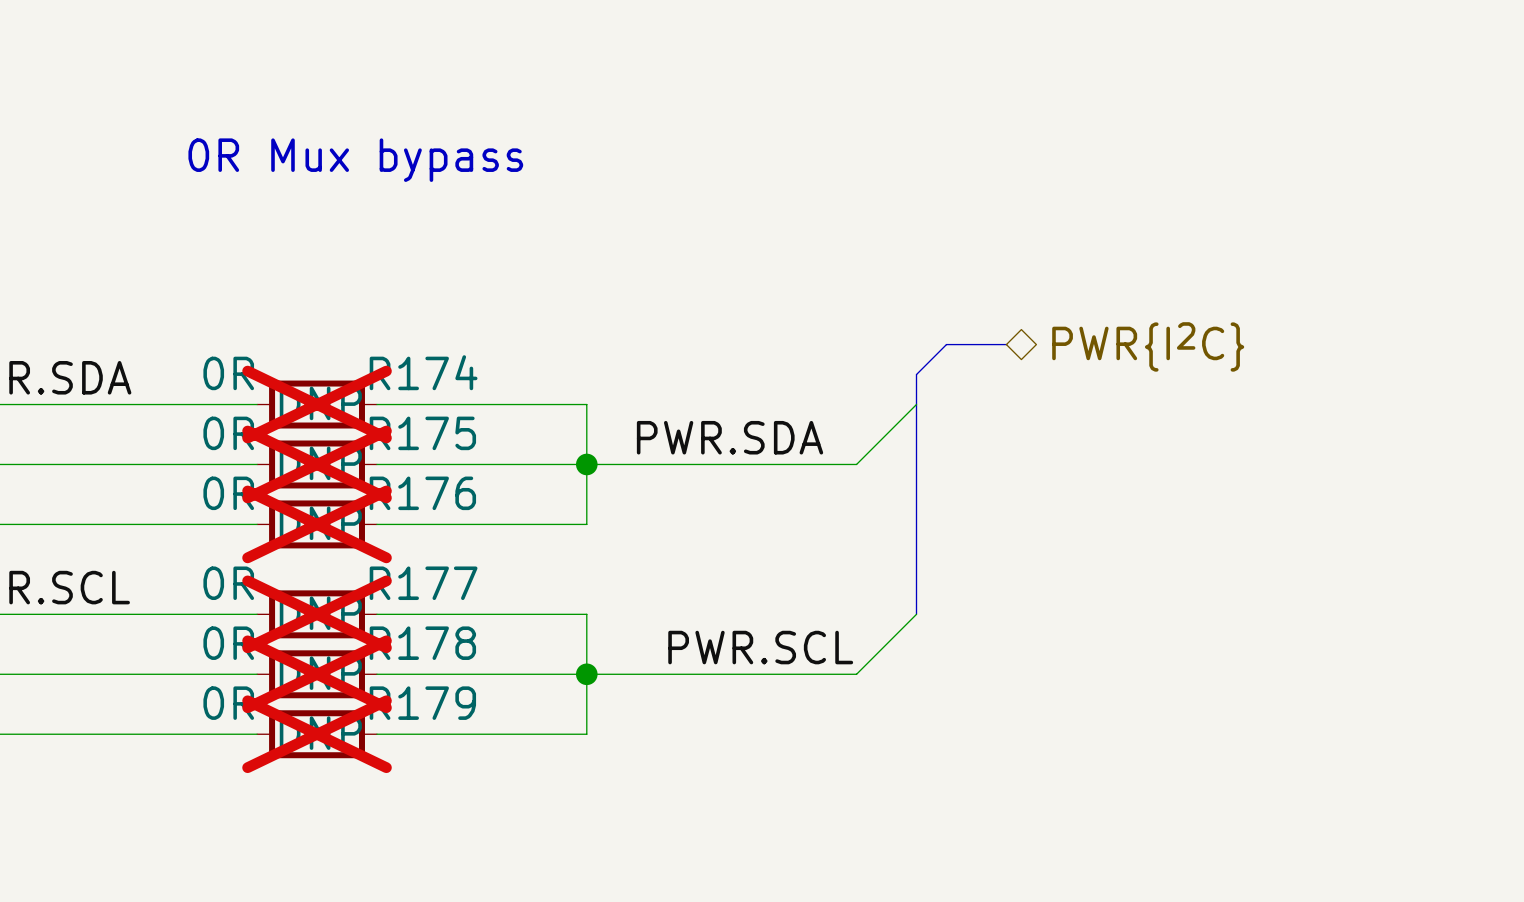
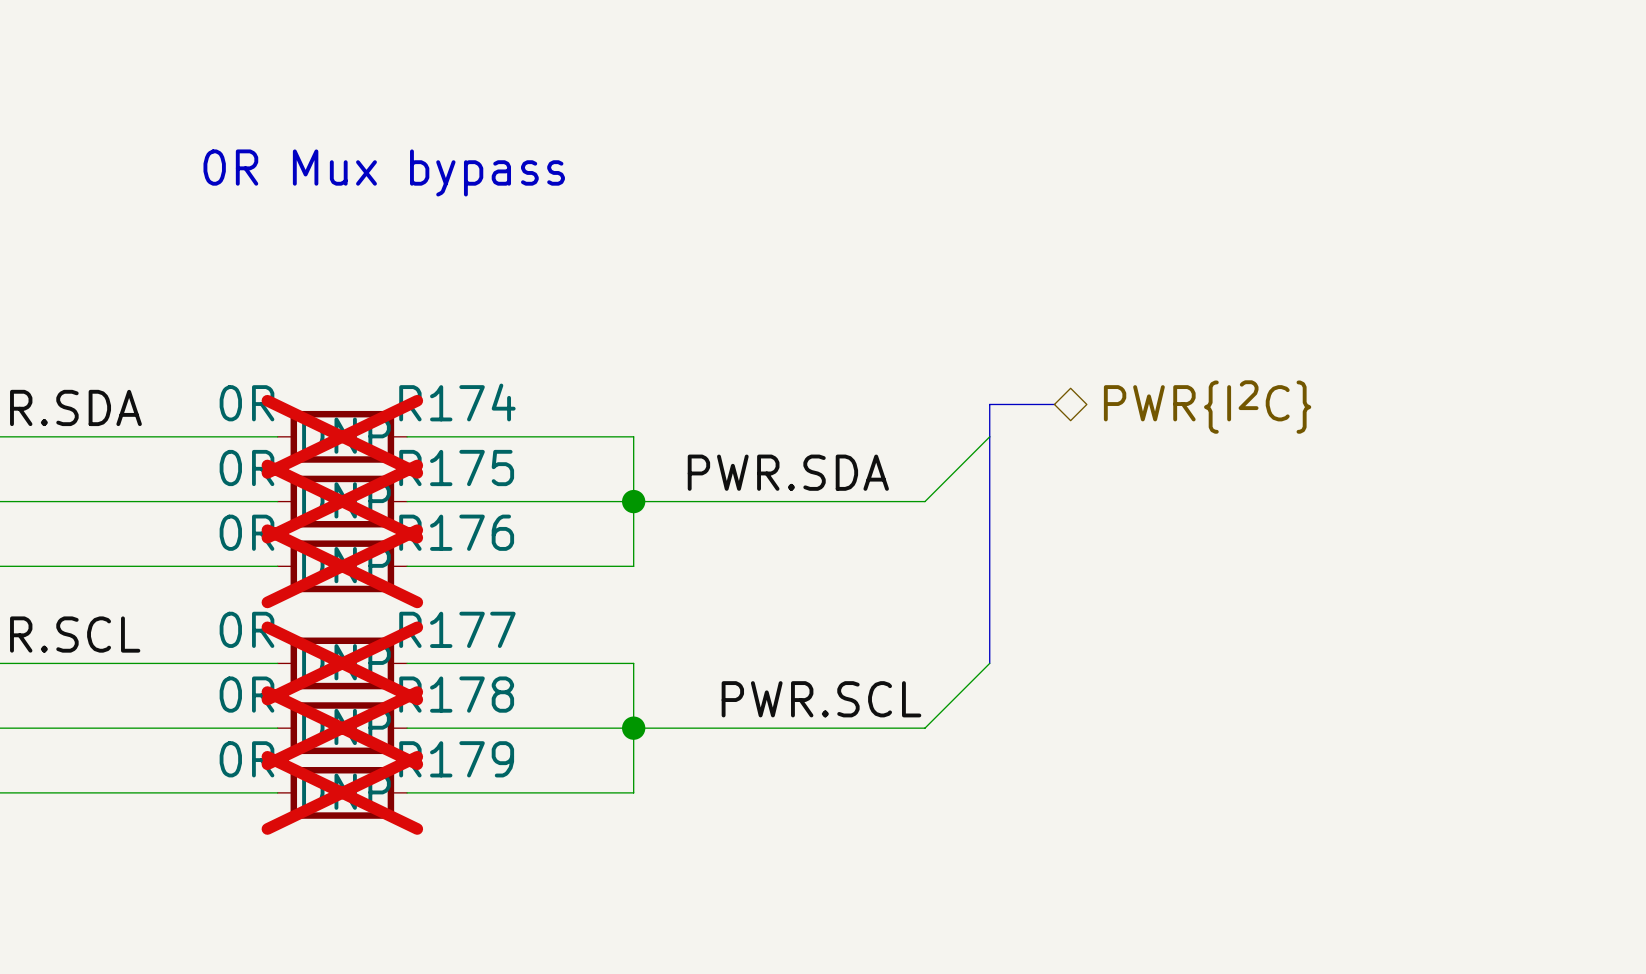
bus: (1006, 344) (946, 344) (916, 374) -> (1054, 404) (989, 404)
hierarchical label position: PWR{I2C} (1148, 346) -> PWR{I2C} (1207, 407)

